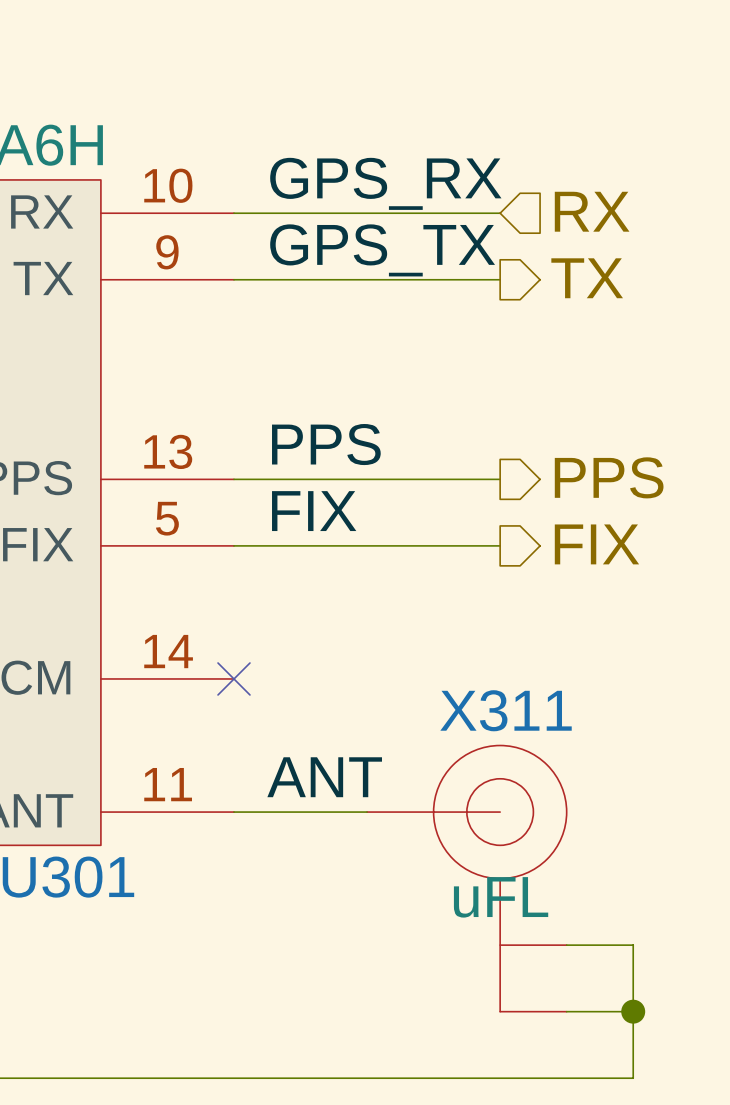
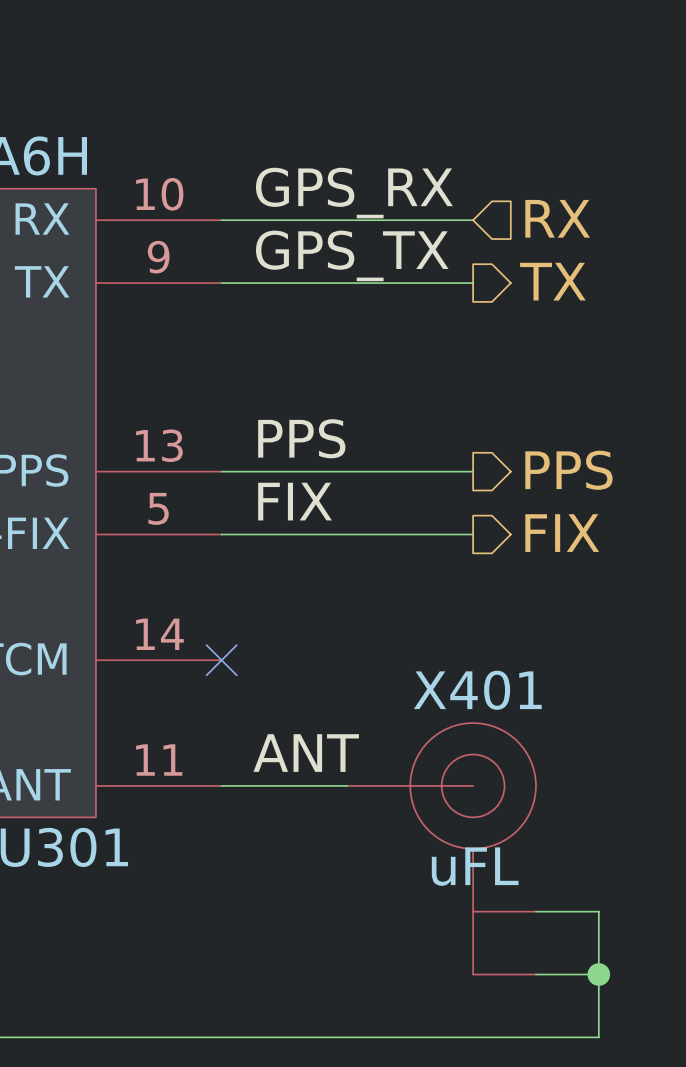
X311 name: X311 (506, 710) -> X401 (477, 690)

